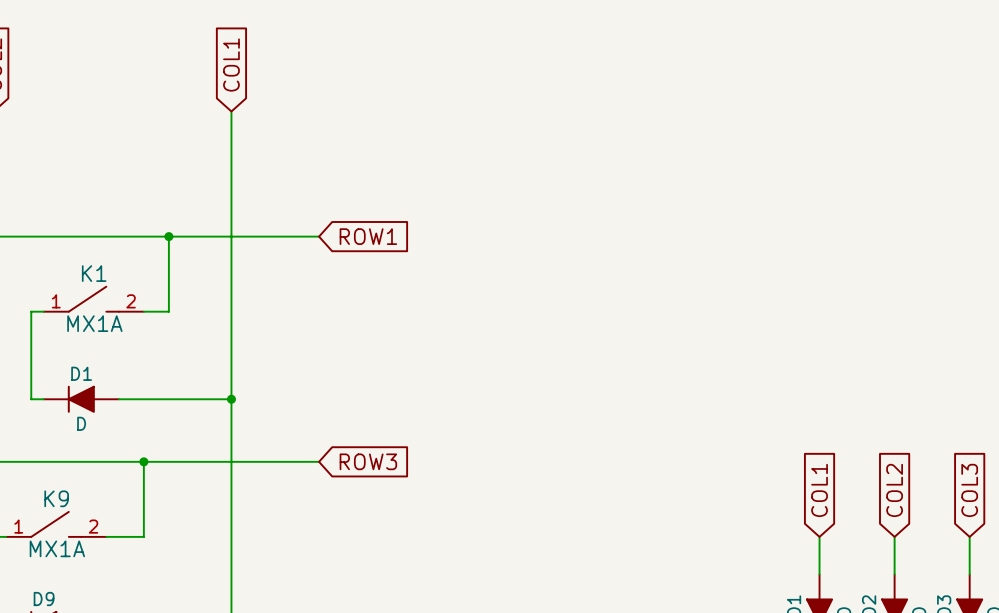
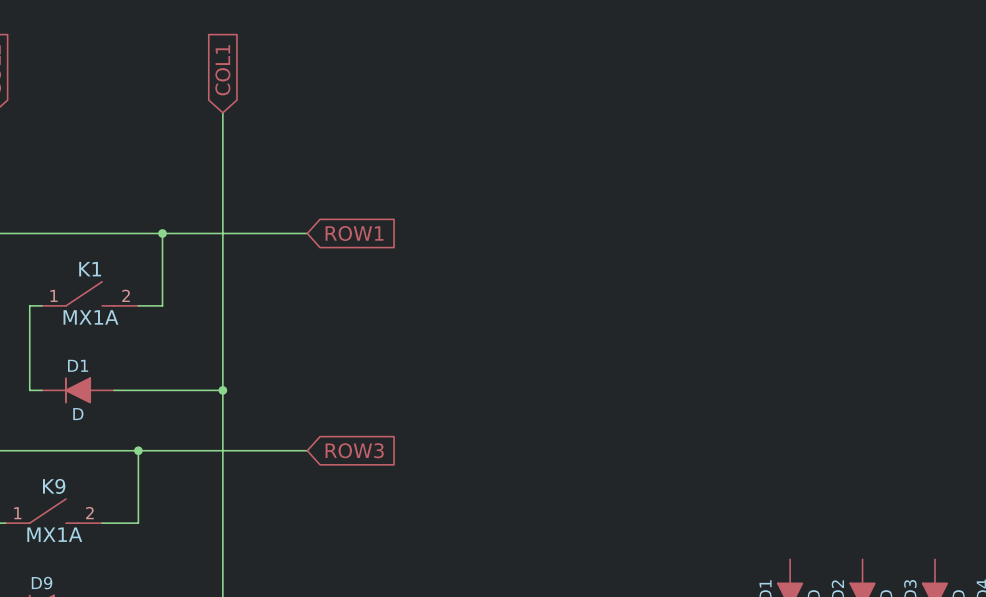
global label: COL1 (819, 490) -> none
global label: COL2 (894, 490) -> none
global label: COL3 (969, 490) -> none
wire: (819, 536) (819, 574) -> none
wire: (894, 536) (894, 574) -> none
wire: (969, 536) (969, 574) -> none

